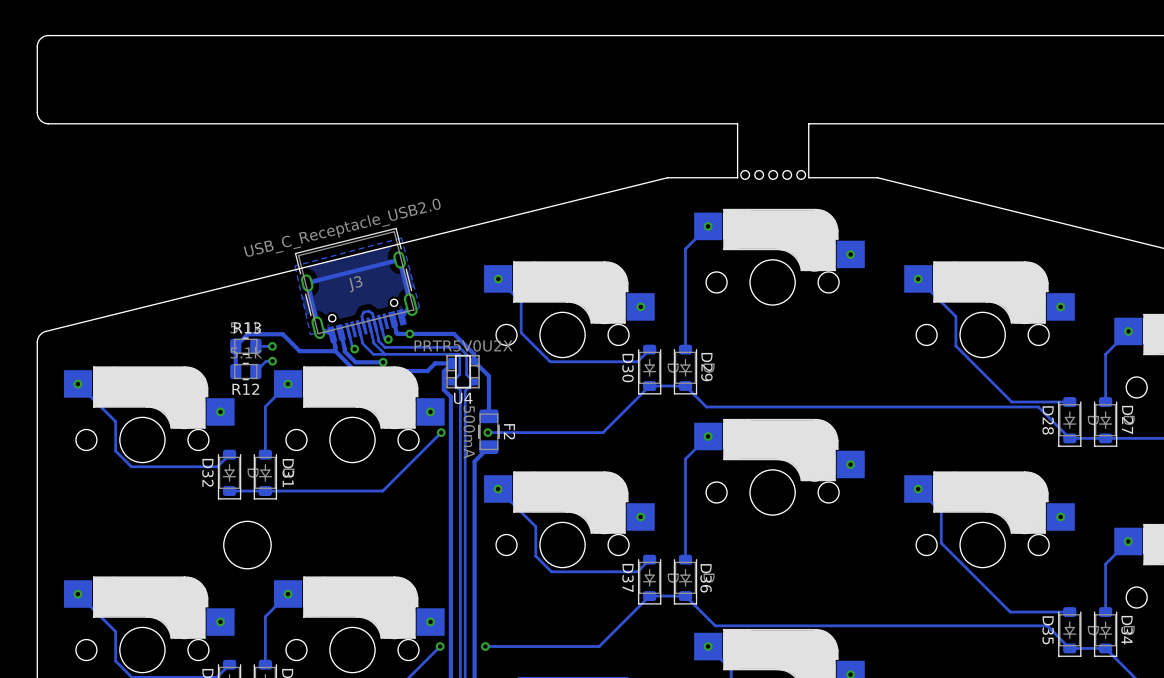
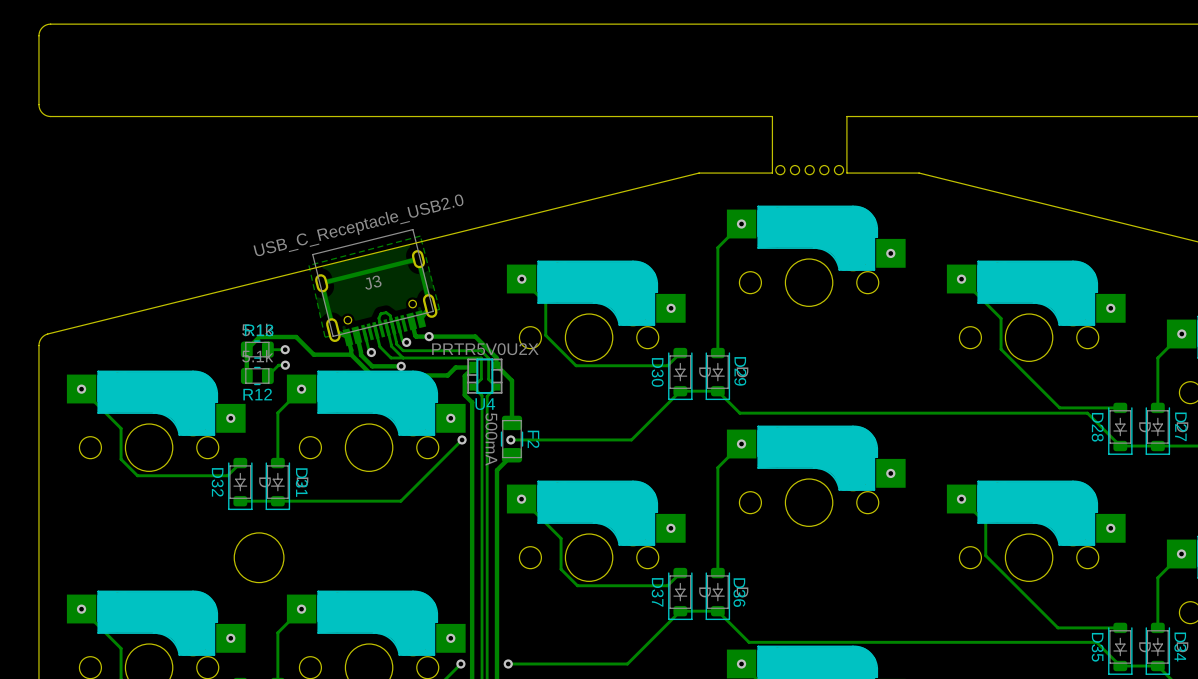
J3 footprint: [294, 227, 418, 344] -> [312, 229, 438, 347]

